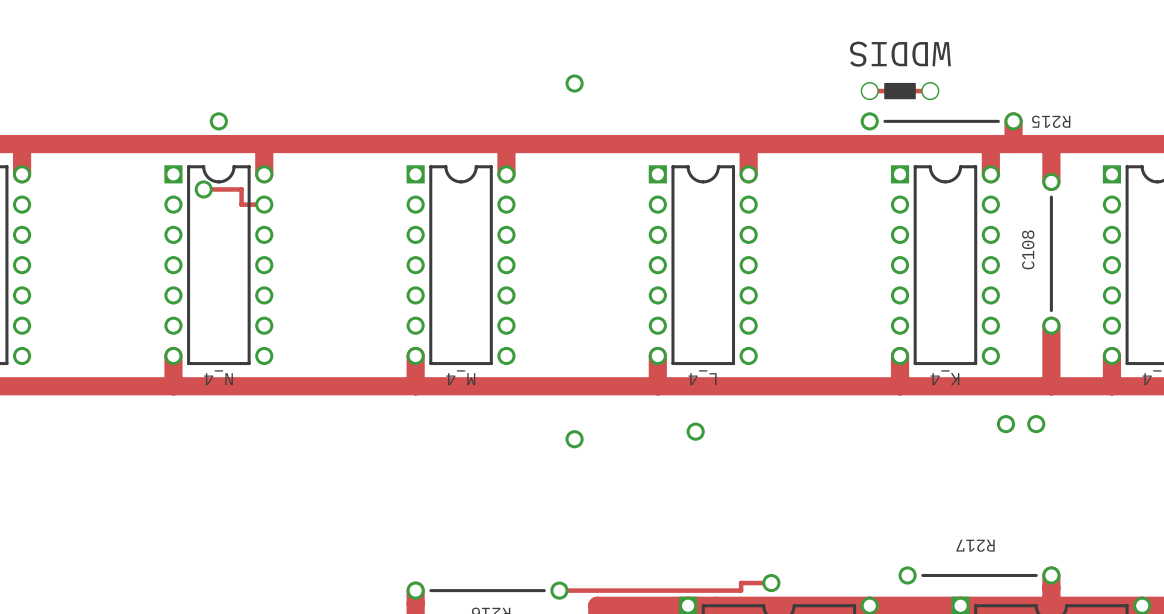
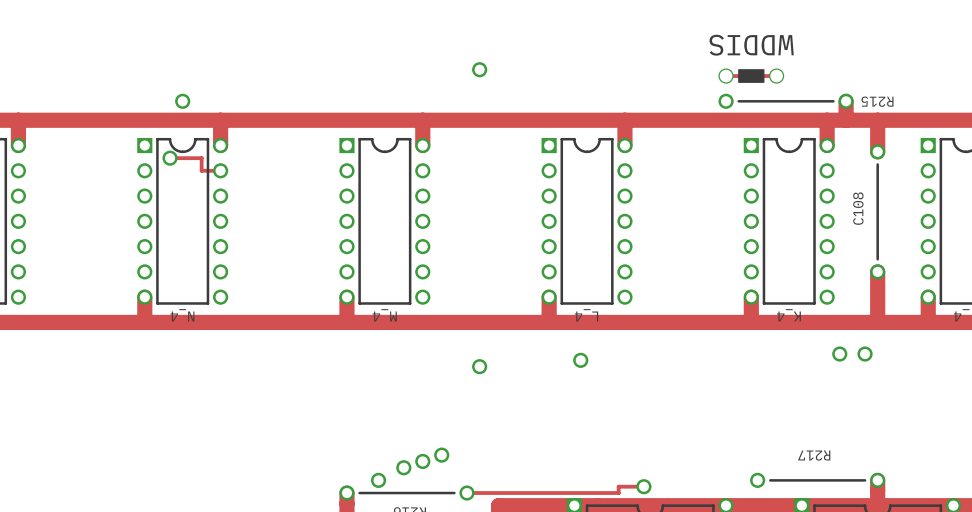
via: none -> (441, 455)
via: none -> (422, 461)
via: none -> (403, 467)
via: none -> (378, 480)

